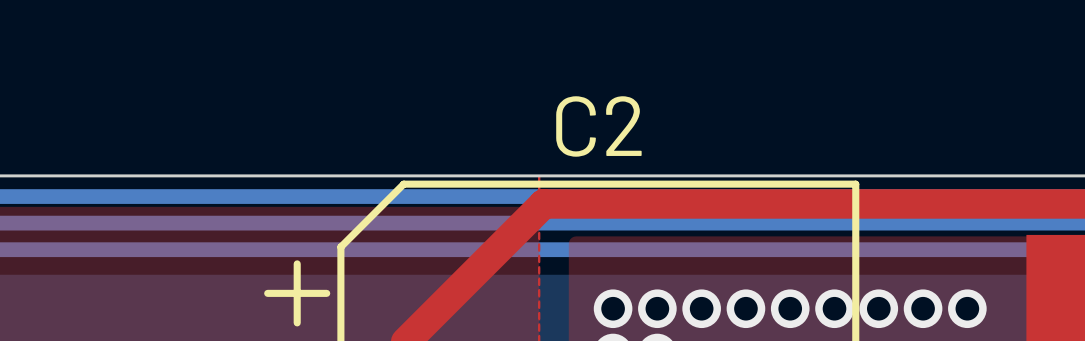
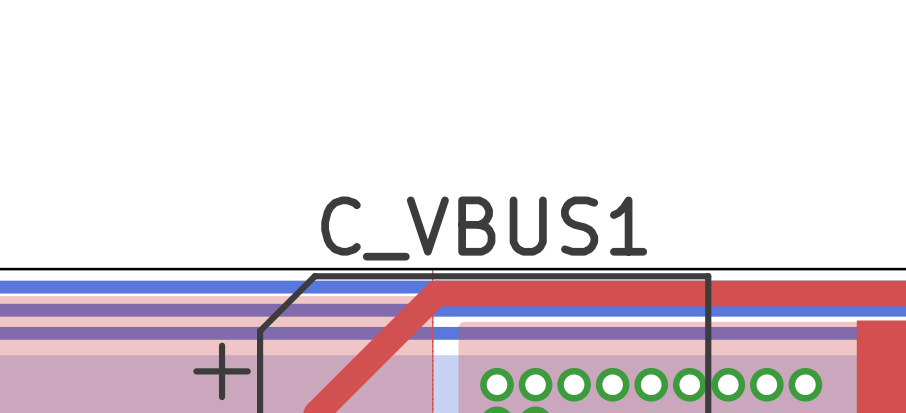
C2 name: C2 (598, 126) -> C_VBUS1 (484, 228)

